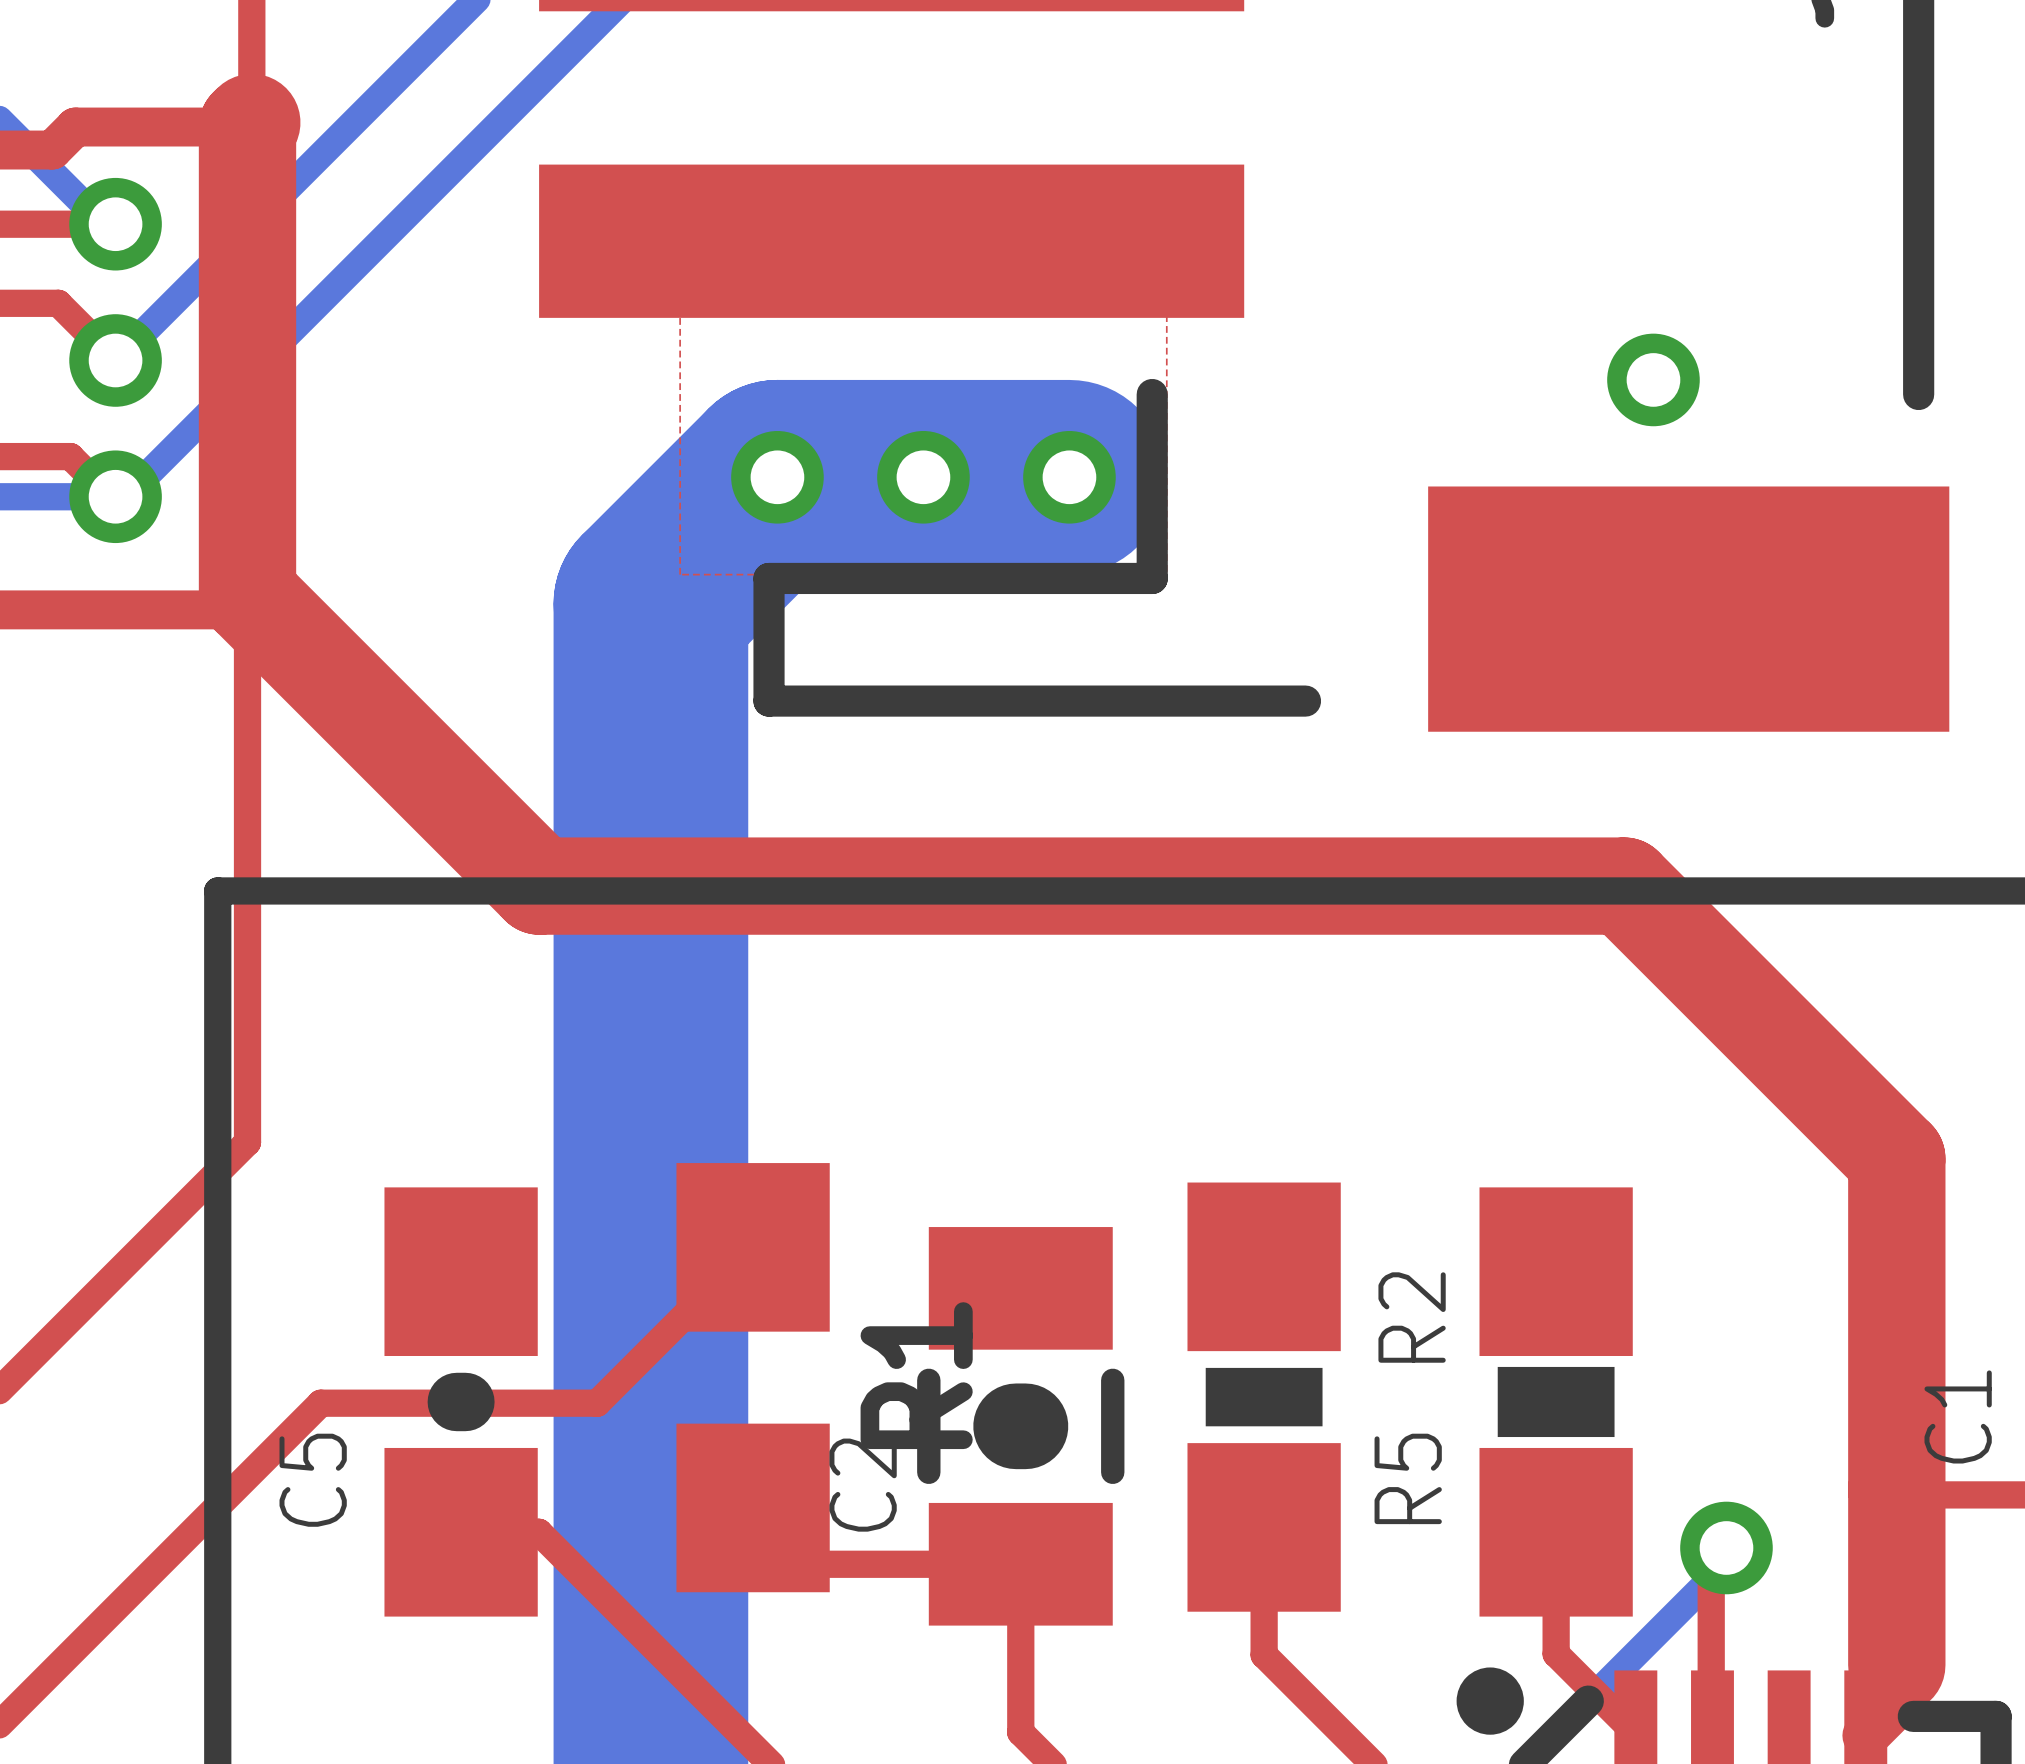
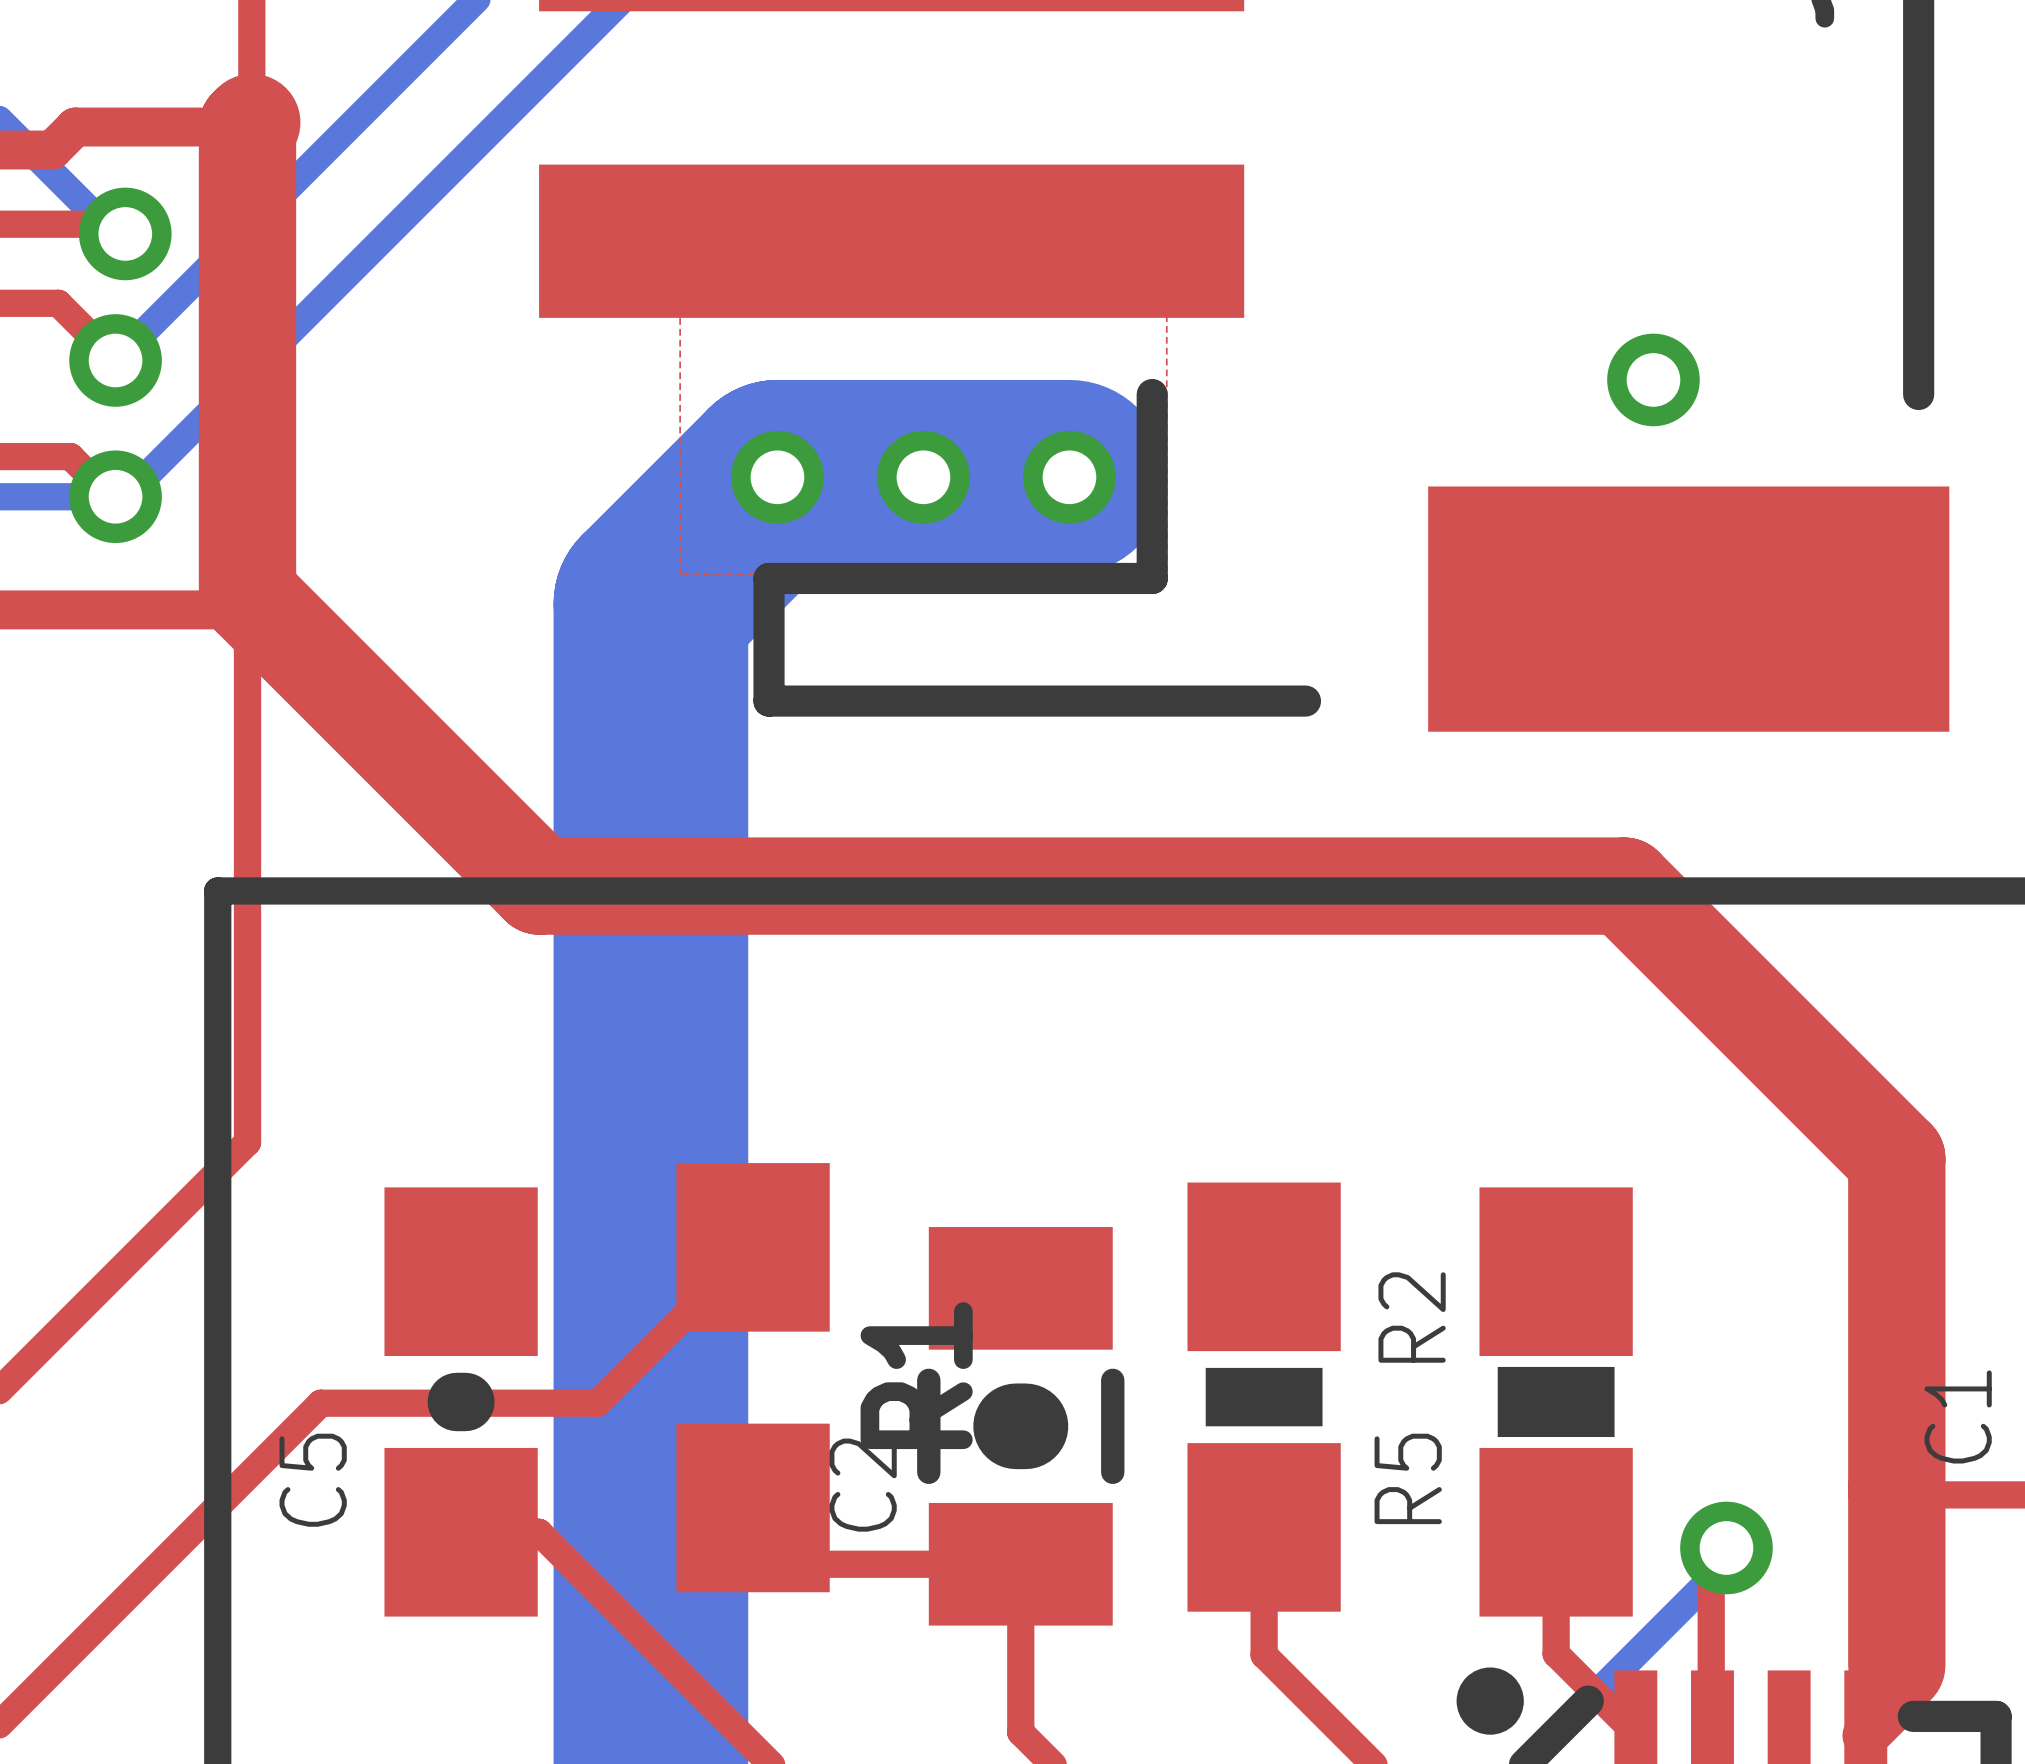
via position: (115, 224) -> (125, 233)

